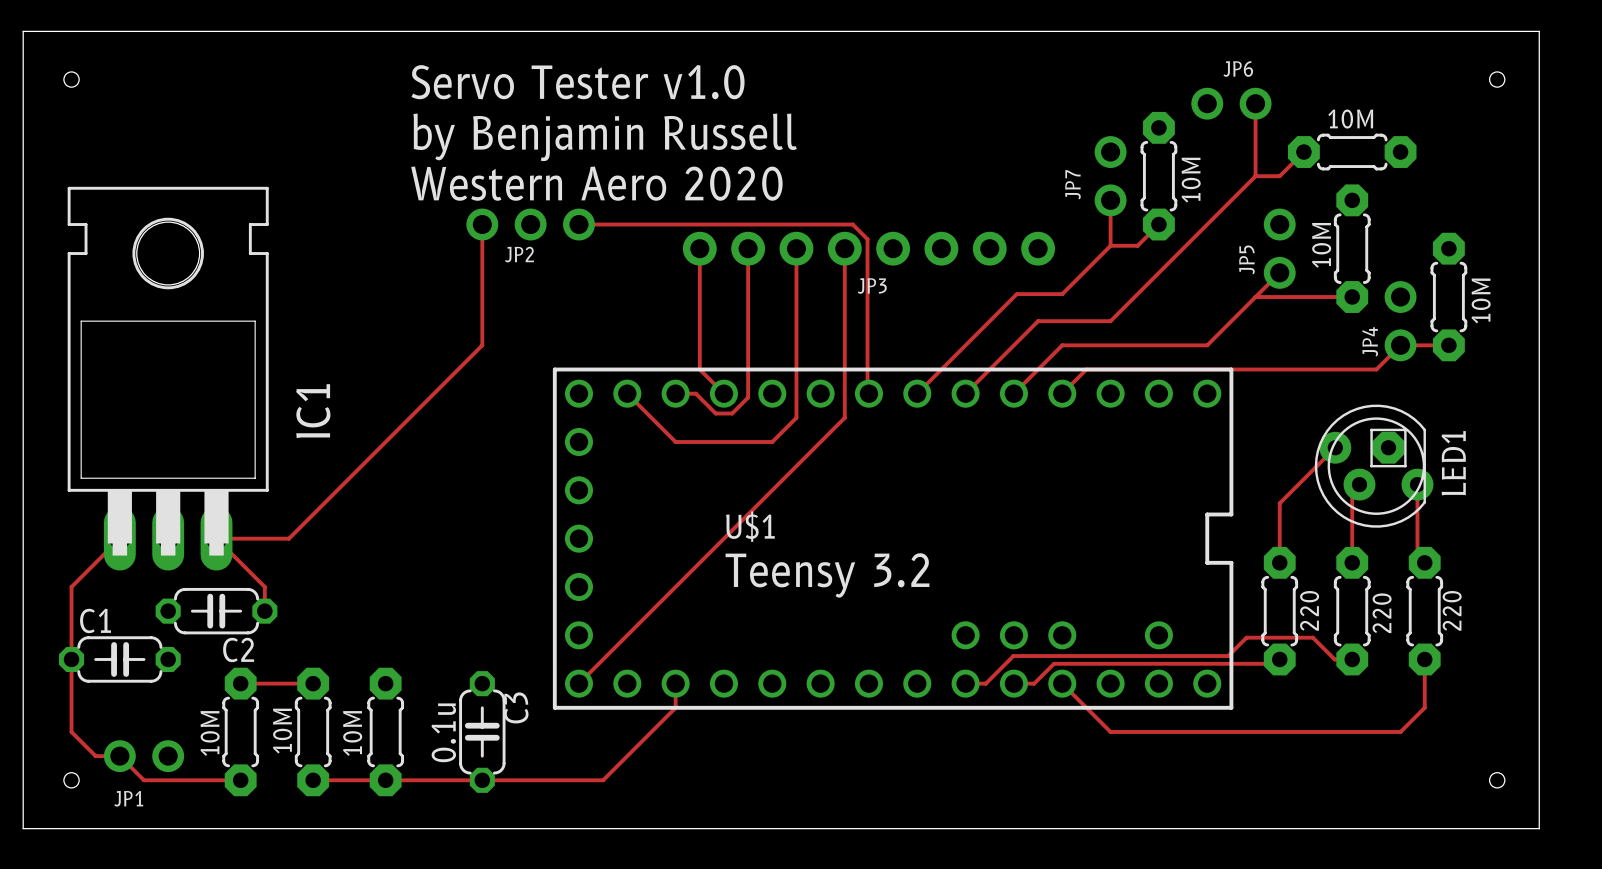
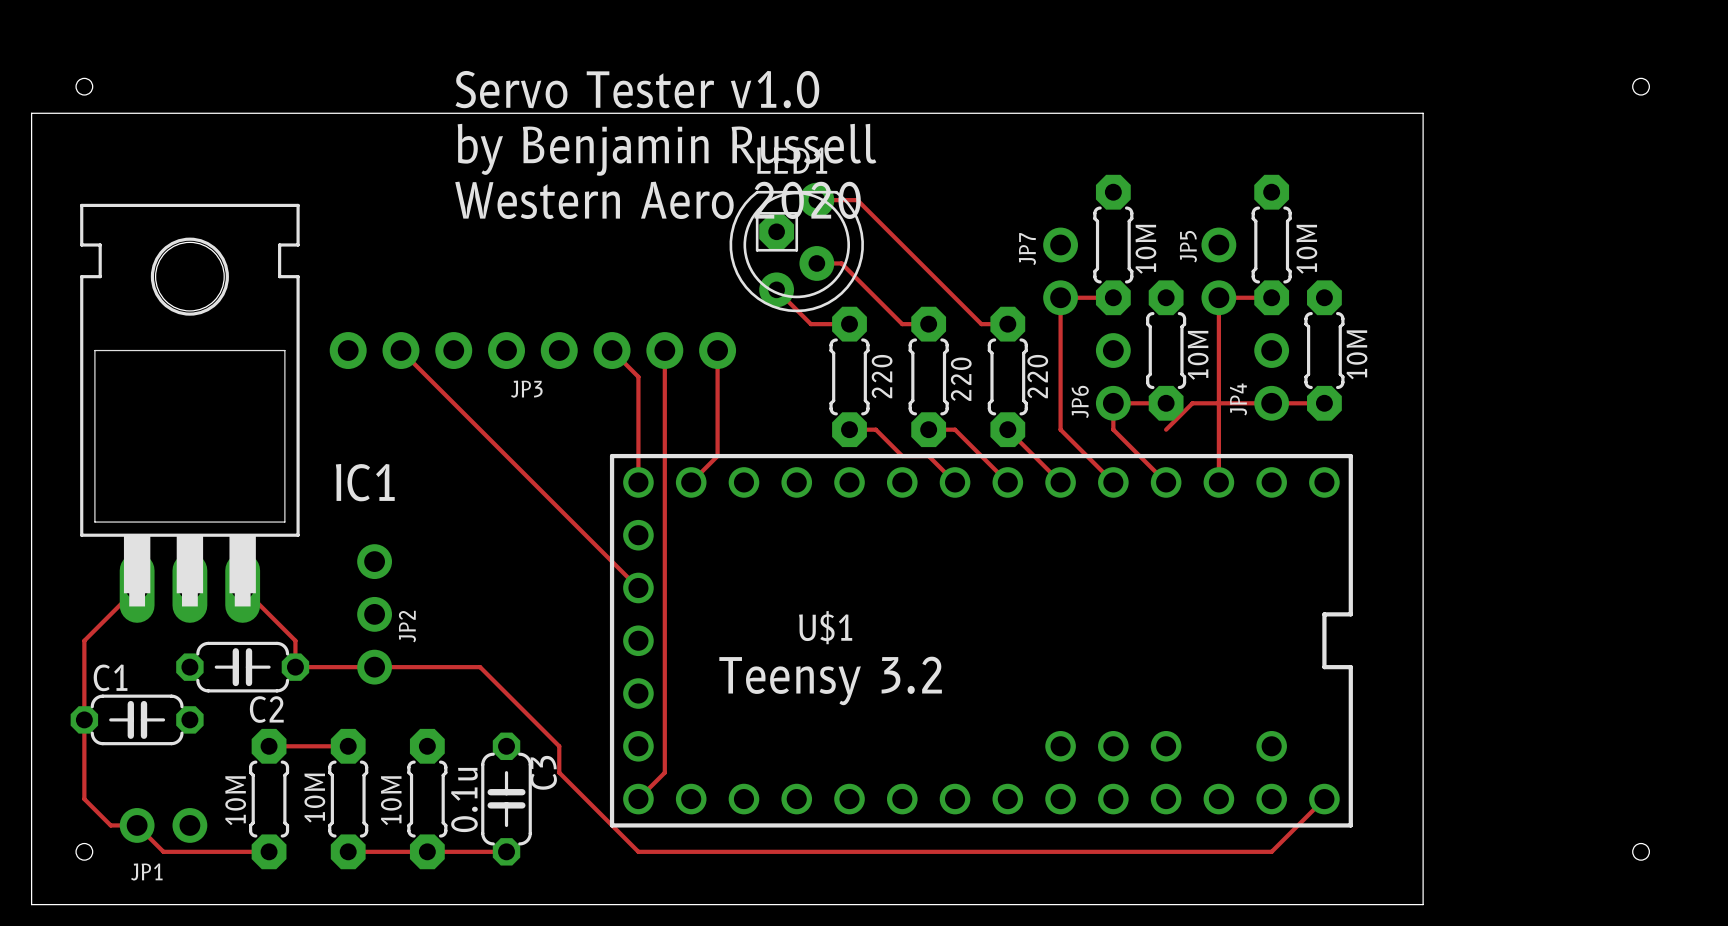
JP6 name position: JP6 (1238, 68) -> JP6 (1080, 401)
board edge: (23, 103) (23, 31) (1539, 31) (1539, 828) (1297, 828) -> (31, 113) (1423, 113) (1423, 904)
JP6 rotation: 0° (1231, 103) -> 90° clockwise (1113, 376)
JP6 position: (1231, 103) -> (1113, 376)
track: (1255, 103) (1255, 176) -> none
track: (1303, 152) (1279, 176) (1255, 176) -> none
part: 10M (1352, 152) -> none
JP7 position: (1110, 176) -> (1060, 271)
part position: (1158, 176) -> (1271, 244)
track: (1255, 176) (1110, 321) (1038, 321) (965, 393) -> none
track: none -> (816, 200) (857, 200) (981, 324) (1007, 324)
JP7 name position: JP7 (1072, 184) -> JP7 (1027, 249)
track: (1110, 200) (1110, 245) -> none
track: (482, 224) (482, 345) (289, 538) (216, 538) -> none
JP2 rotation: 0° (530, 224) -> 90° clockwise (374, 614)
JP2 position: (530, 224) -> (374, 614)
track: (578, 224) (852, 224) (867, 239) (868, 393) -> none
part: none -> 10M (1113, 244)
track: (1158, 224) (1137, 245) (1110, 245) -> none
track: none -> (816, 263) (841, 263) (902, 324) (928, 324)
track: (1110, 245) (1062, 294) (1016, 294) (917, 393) -> (1060, 482) (1007, 429)
track: (699, 248) (699, 369) (723, 393) -> none
track: (748, 248) (748, 397) (732, 413) (715, 413) (695, 393) (675, 393) -> none
track: (796, 248) (796, 417) (772, 442) (675, 442) (627, 393) -> none
track: (844, 248) (844, 417) (578, 683) -> none
JP3 position: (868, 248) -> (532, 350)
JP5 position: (1279, 248) -> (1218, 271)
part: 10M (1352, 248) -> none
JP2 name position: JP2 (519, 254) -> JP2 (407, 626)
JP5 name position: JP5 (1246, 259) -> JP5 (1188, 246)
track: none -> (776, 289) (810, 324) (849, 324)
track: none -> (1113, 297) (1060, 297) (1060, 429) (1113, 482)
track: none -> (1271, 297) (1218, 297) (1218, 482)
track: (1279, 272) (1207, 345) (1062, 345) (1013, 393) -> none
JP3 name position: JP3 (872, 285) -> JP3 (526, 389)
track: (1255, 297) (1352, 297) -> none
part: 10M (1448, 297) -> none
track: none -> (400, 350) (638, 587)
track: none -> (612, 350) (638, 376) (638, 482)
track: none -> (664, 350) (664, 772) (638, 799)
track: none -> (717, 350) (717, 456) (691, 482)
part: none -> 10M (1166, 350)
part: none -> 10M (1324, 350)
JP4 position: (1400, 321) -> (1271, 376)
part: none -> 220 (849, 376)
part: none -> 220 (928, 376)
part: none -> 220 (1007, 376)
track: (1448, 345) (1400, 345) (1376, 369) (1207, 369) -> none
track: none -> (1166, 403) (1113, 403) (1113, 429) (1166, 482)
track: none -> (849, 429) (875, 429) (902, 456) (928, 456) (955, 482)
track: none -> (928, 429) (955, 429) (1007, 482)
IC1 name rotation: 0° (313, 411) -> 90° clockwise (365, 482)
track: (1335, 447) (1279, 503) (1279, 562) -> none
LED1 rotation: 0° (1374, 466) -> 90° counterclockwise (796, 247)
LED1 position: (1374, 466) -> (796, 247)
track: (1359, 484) (1352, 491) (1352, 562) -> none
track: (1417, 484) (1417, 555) (1424, 562) -> none
U$1 position: (893, 538) -> (981, 640)
text position: Teensy 3.2 (827, 575) -> Teensy 3.2 (830, 680)
part: 220 (1279, 611) -> none
part: 220 (1352, 611) -> none
part: 220 (1424, 611) -> none
track: (1279, 659) (1275, 663) (1054, 663) (1034, 683) (1013, 683) -> none
track: (1352, 659) (1334, 659) (1312, 637) (1246, 637) (1228, 656) (1013, 656) (985, 683) (965, 683) -> none
track: (1424, 659) (1424, 707) (1400, 731) (1110, 731) (1062, 683) -> none
track: (675, 683) (675, 707) (603, 780) -> (1324, 799) (1271, 851) (664, 851)
C3 position: (482, 731) -> (506, 799)
track: (458, 780) (578, 780) -> (295, 667) (480, 667) (559, 746) (559, 772) (638, 851)

